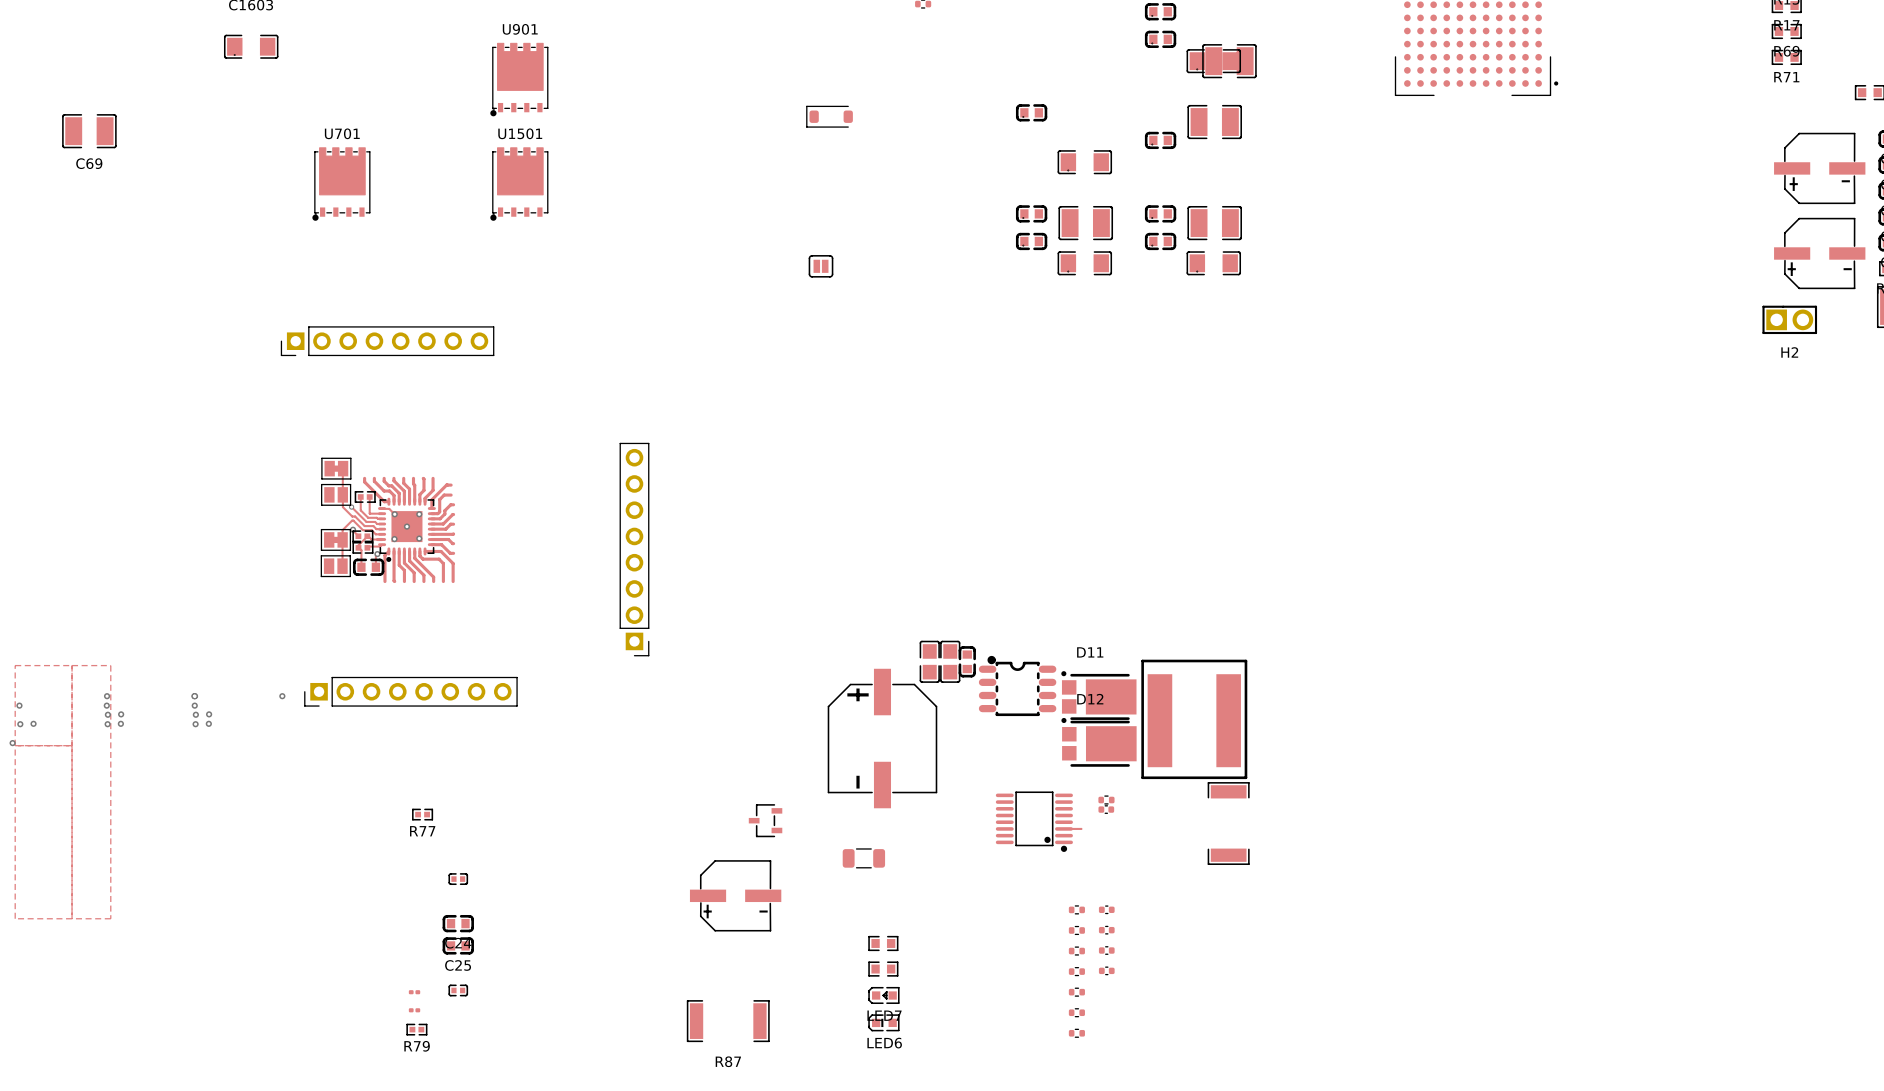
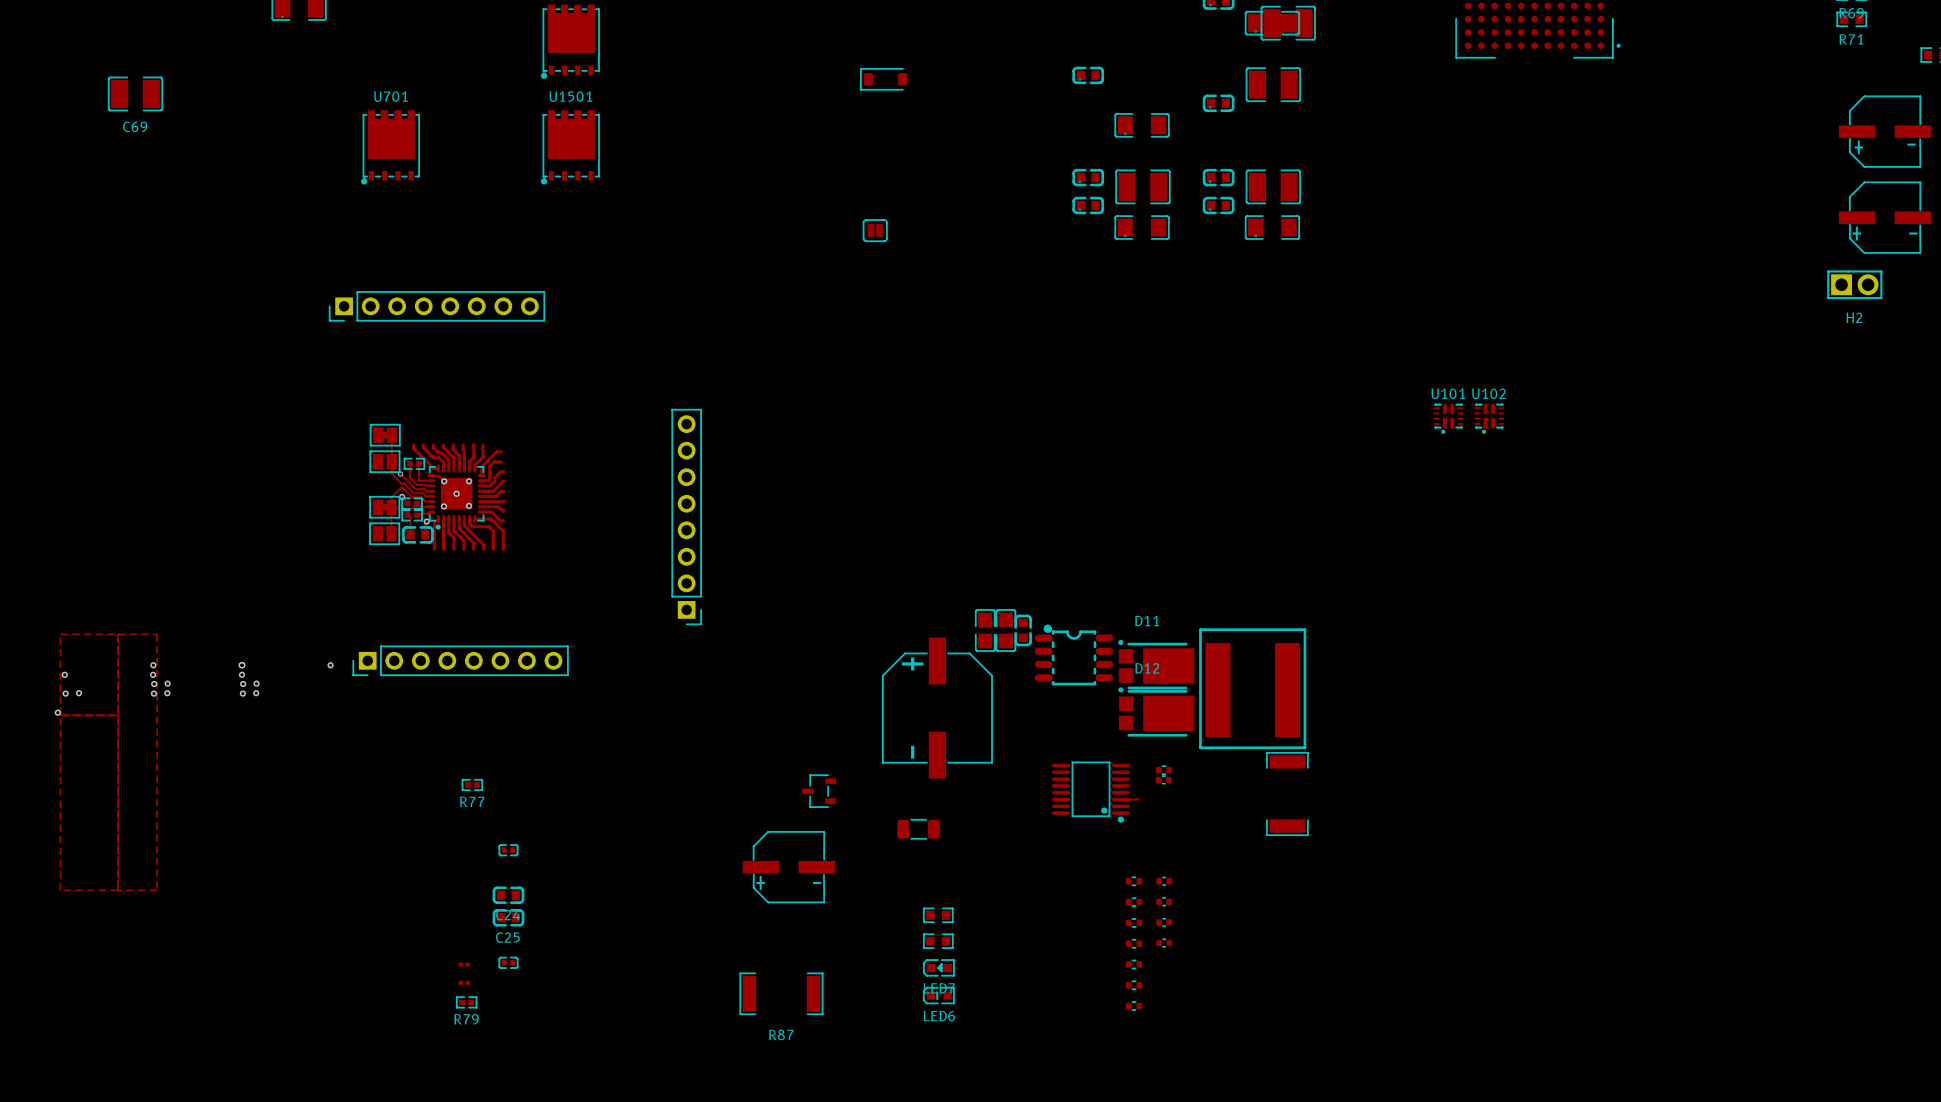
U101: none -> (1448, 418)
U102: none -> (1489, 418)

